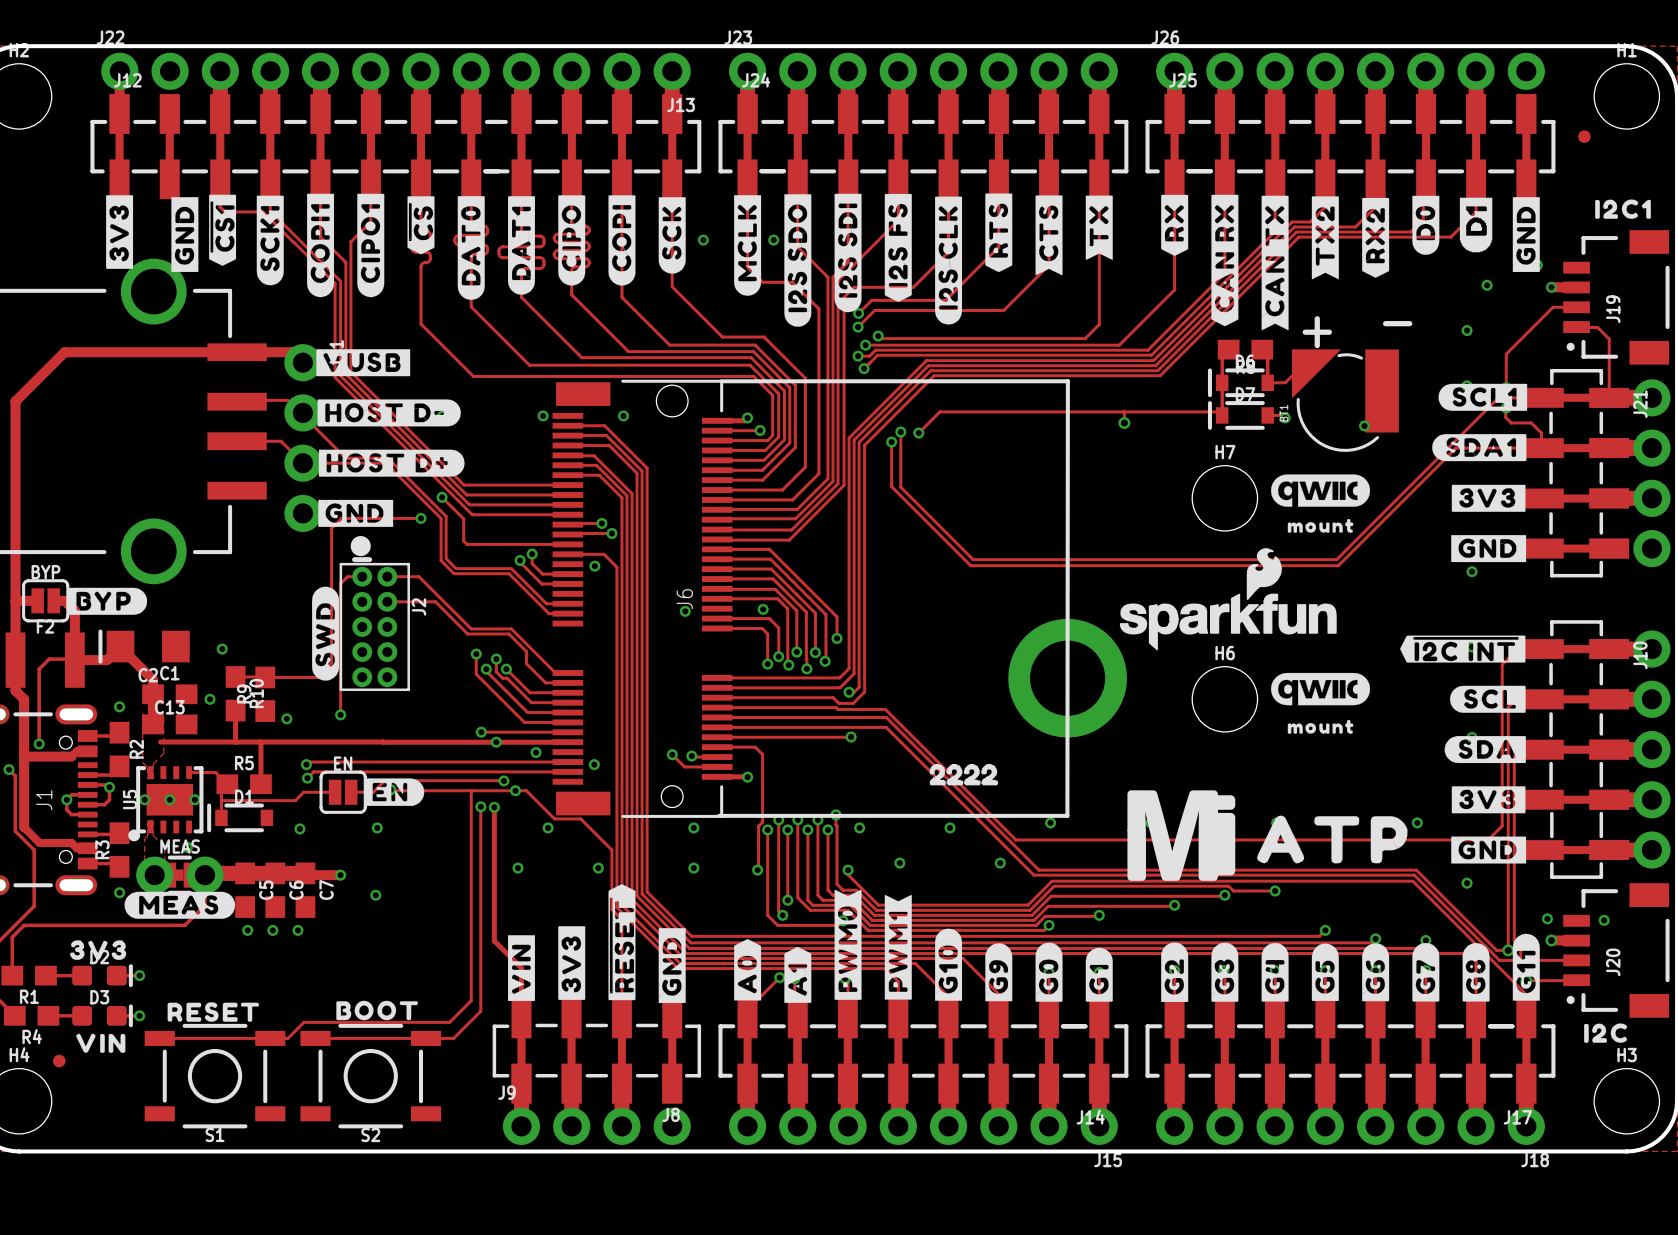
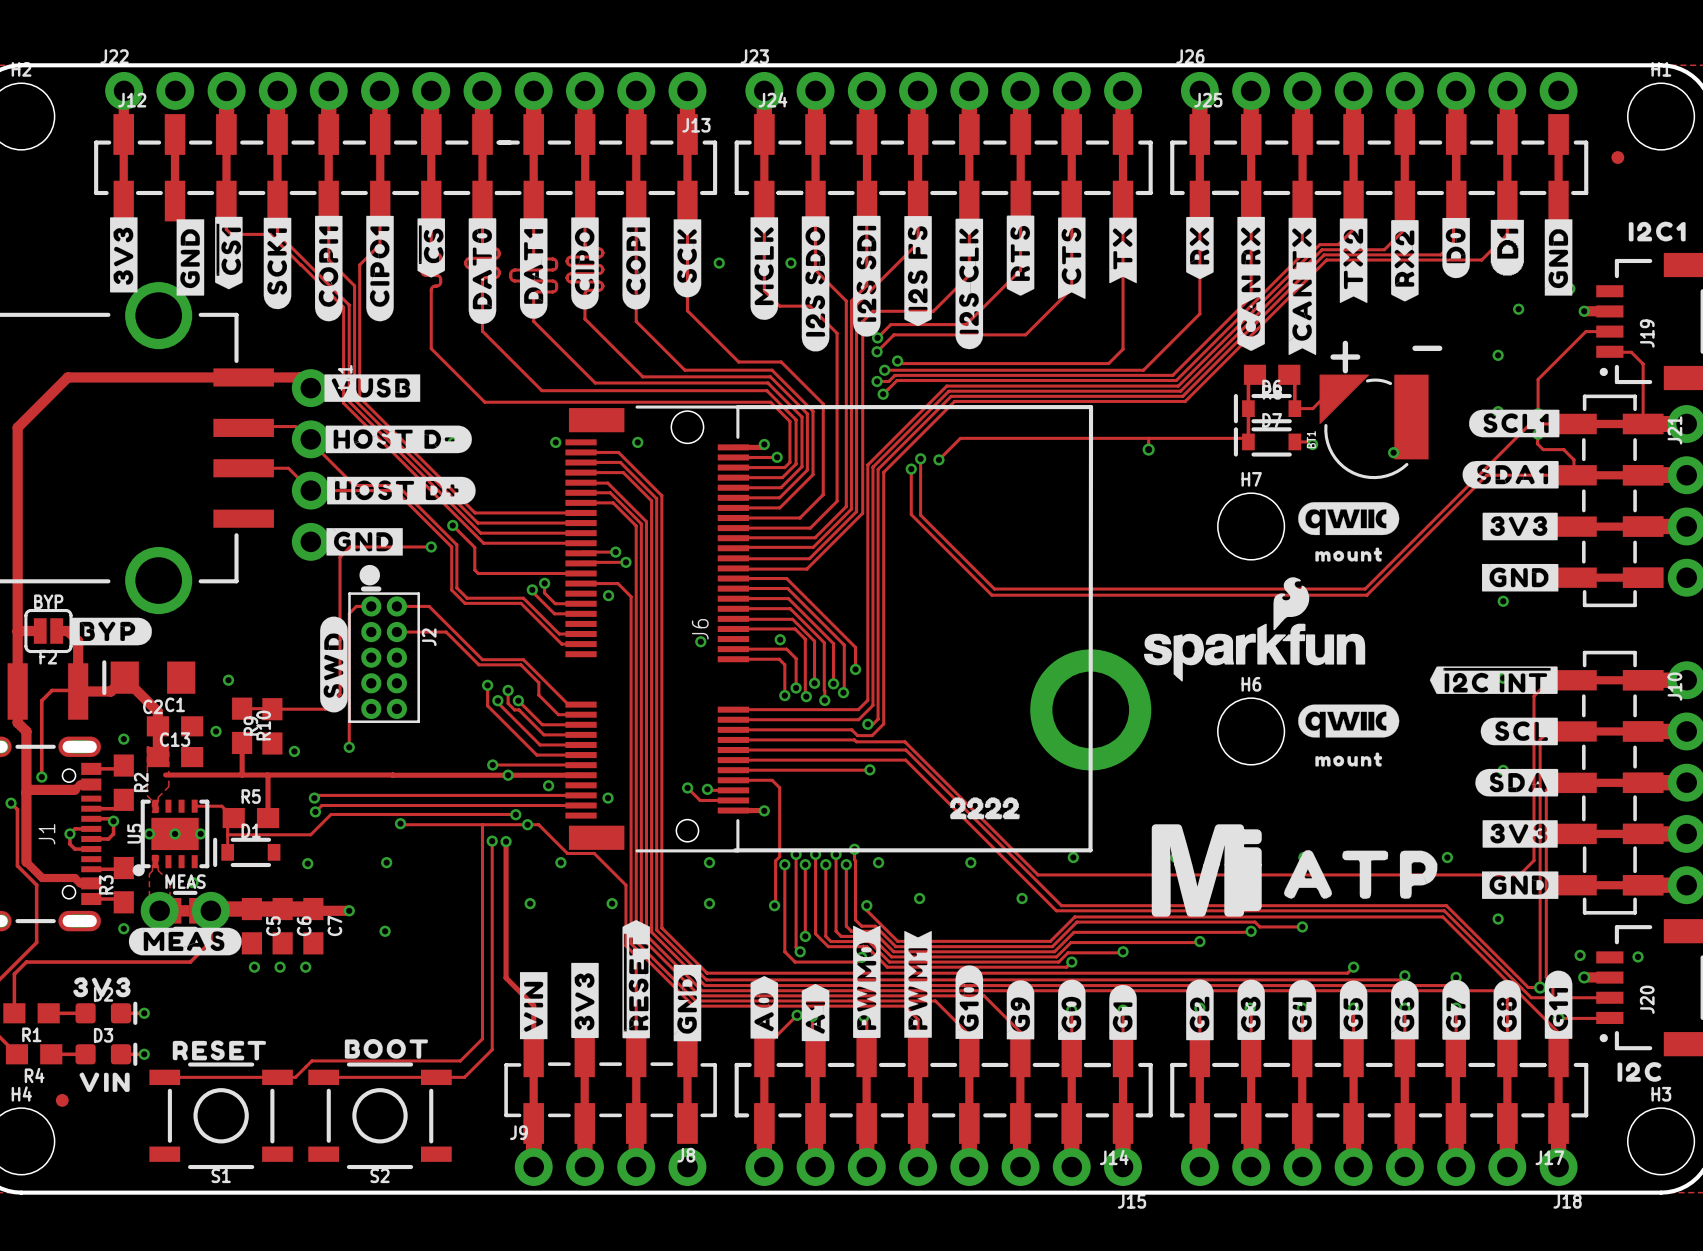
drawing: [364, 778, 425, 807] -> none
track: (384, 780) (373, 792) (351, 792) -> none
track: (335, 792) (303, 792) (295, 800) -> (394, 814) (331, 814) (310, 834) (303, 834)
EN: (343, 792) -> none

